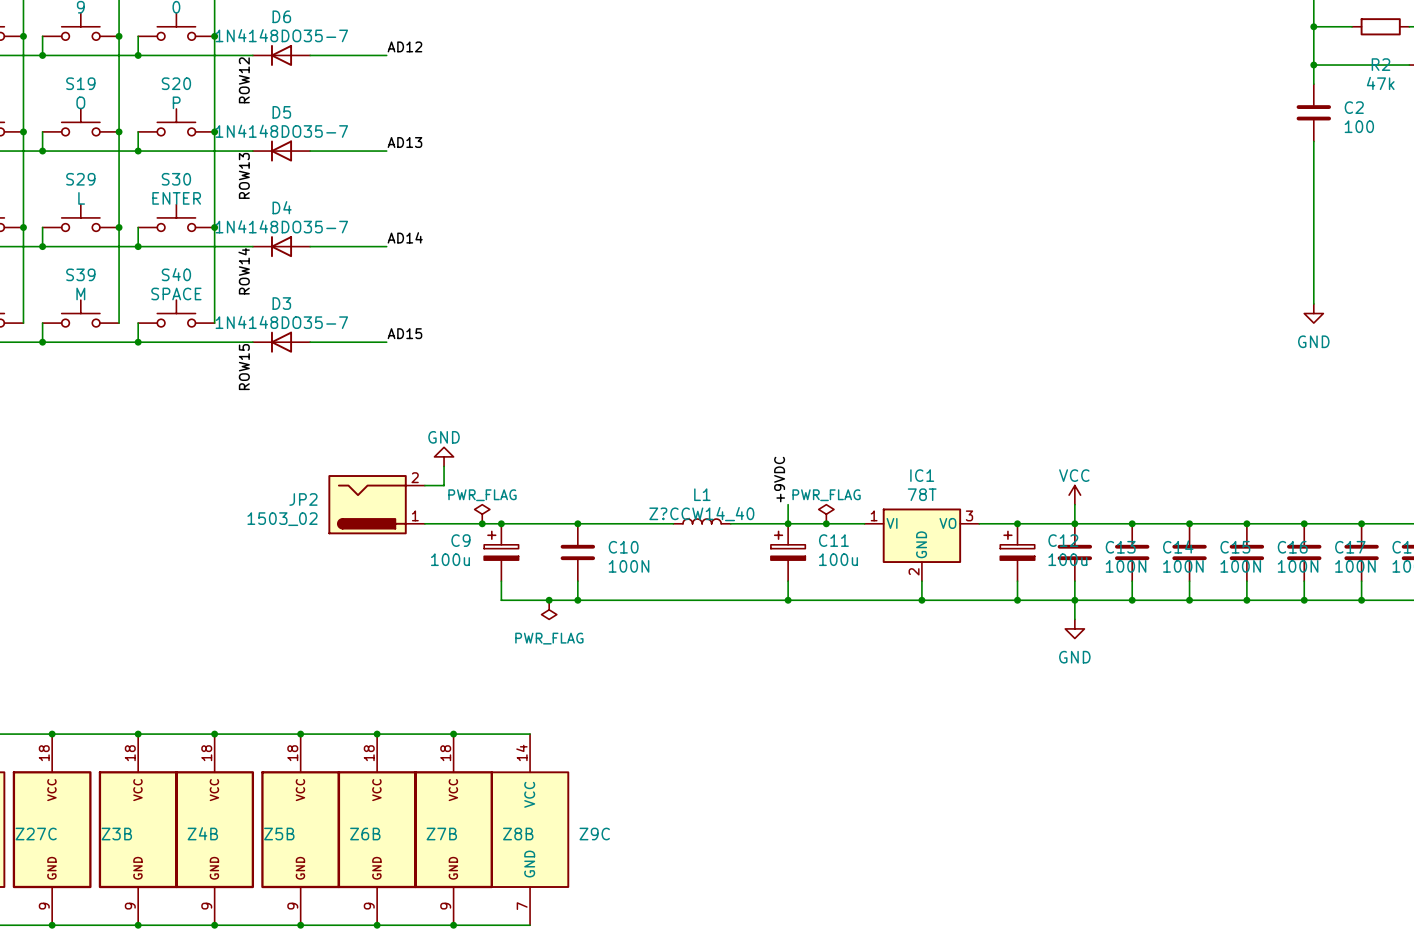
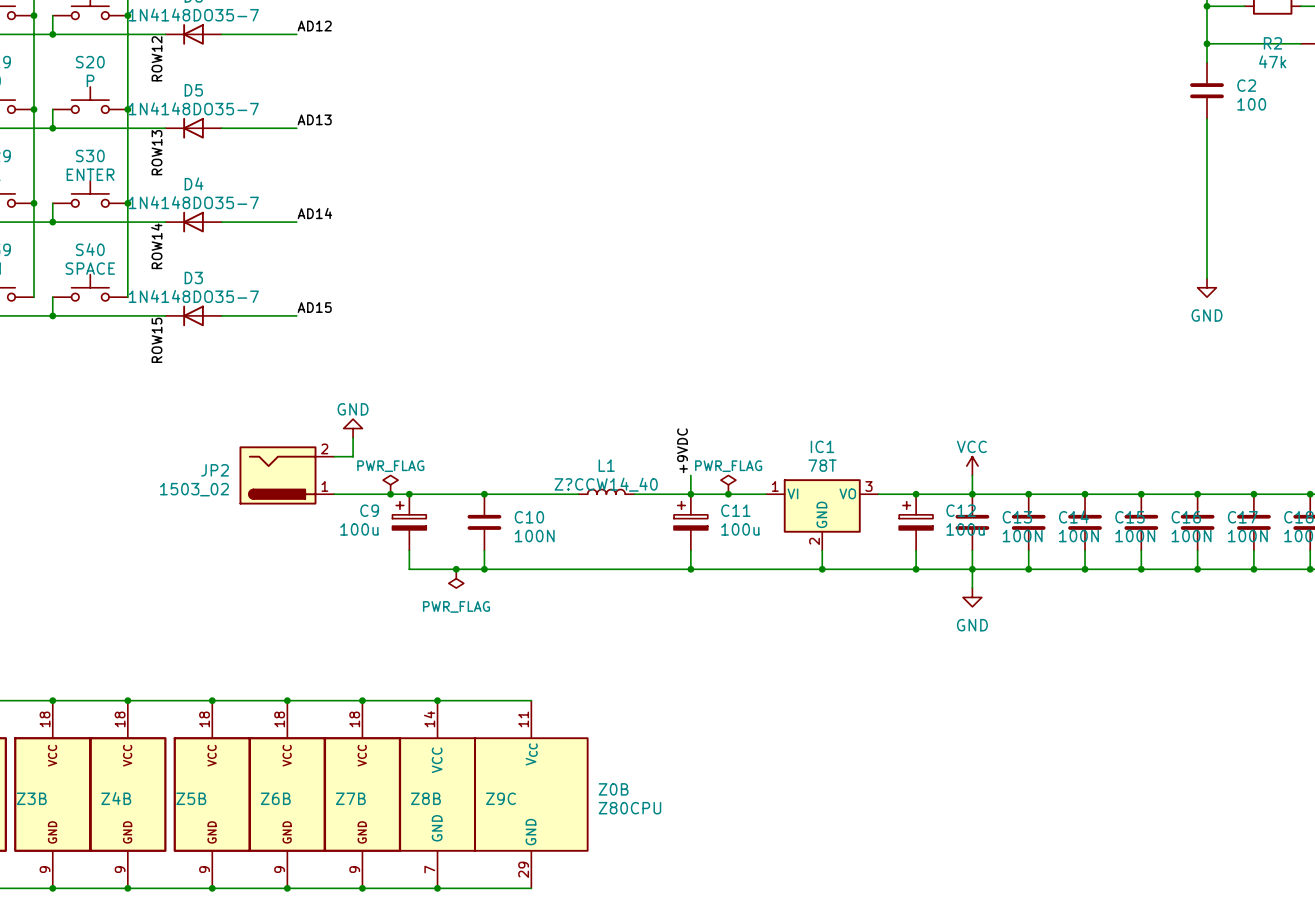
wire: none -> (437, 700) (531, 700)
junction: none -> (437, 700)
Z0B: none -> Z80CPU (531, 794)
wire: none -> (437, 888) (531, 888)
junction: none -> (437, 888)

